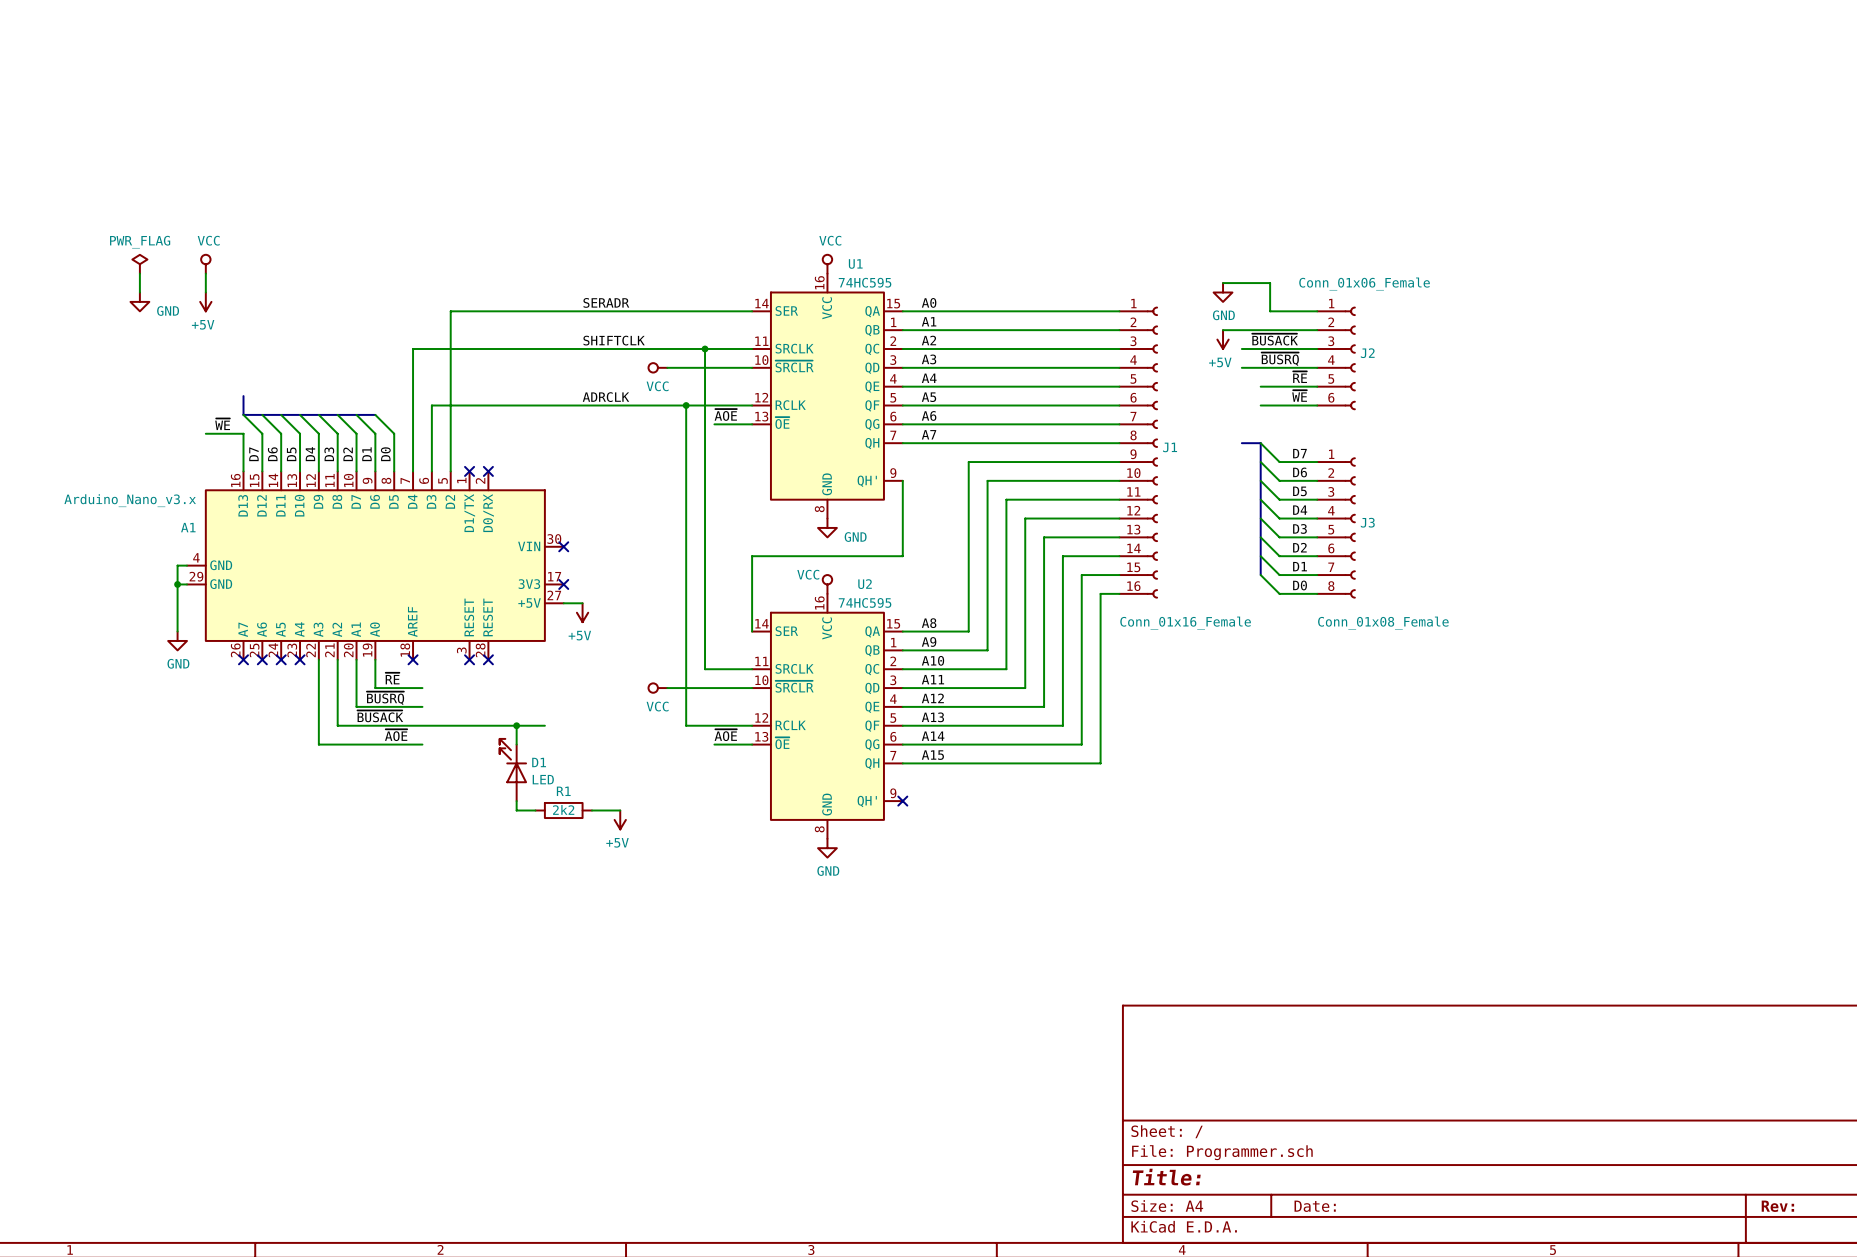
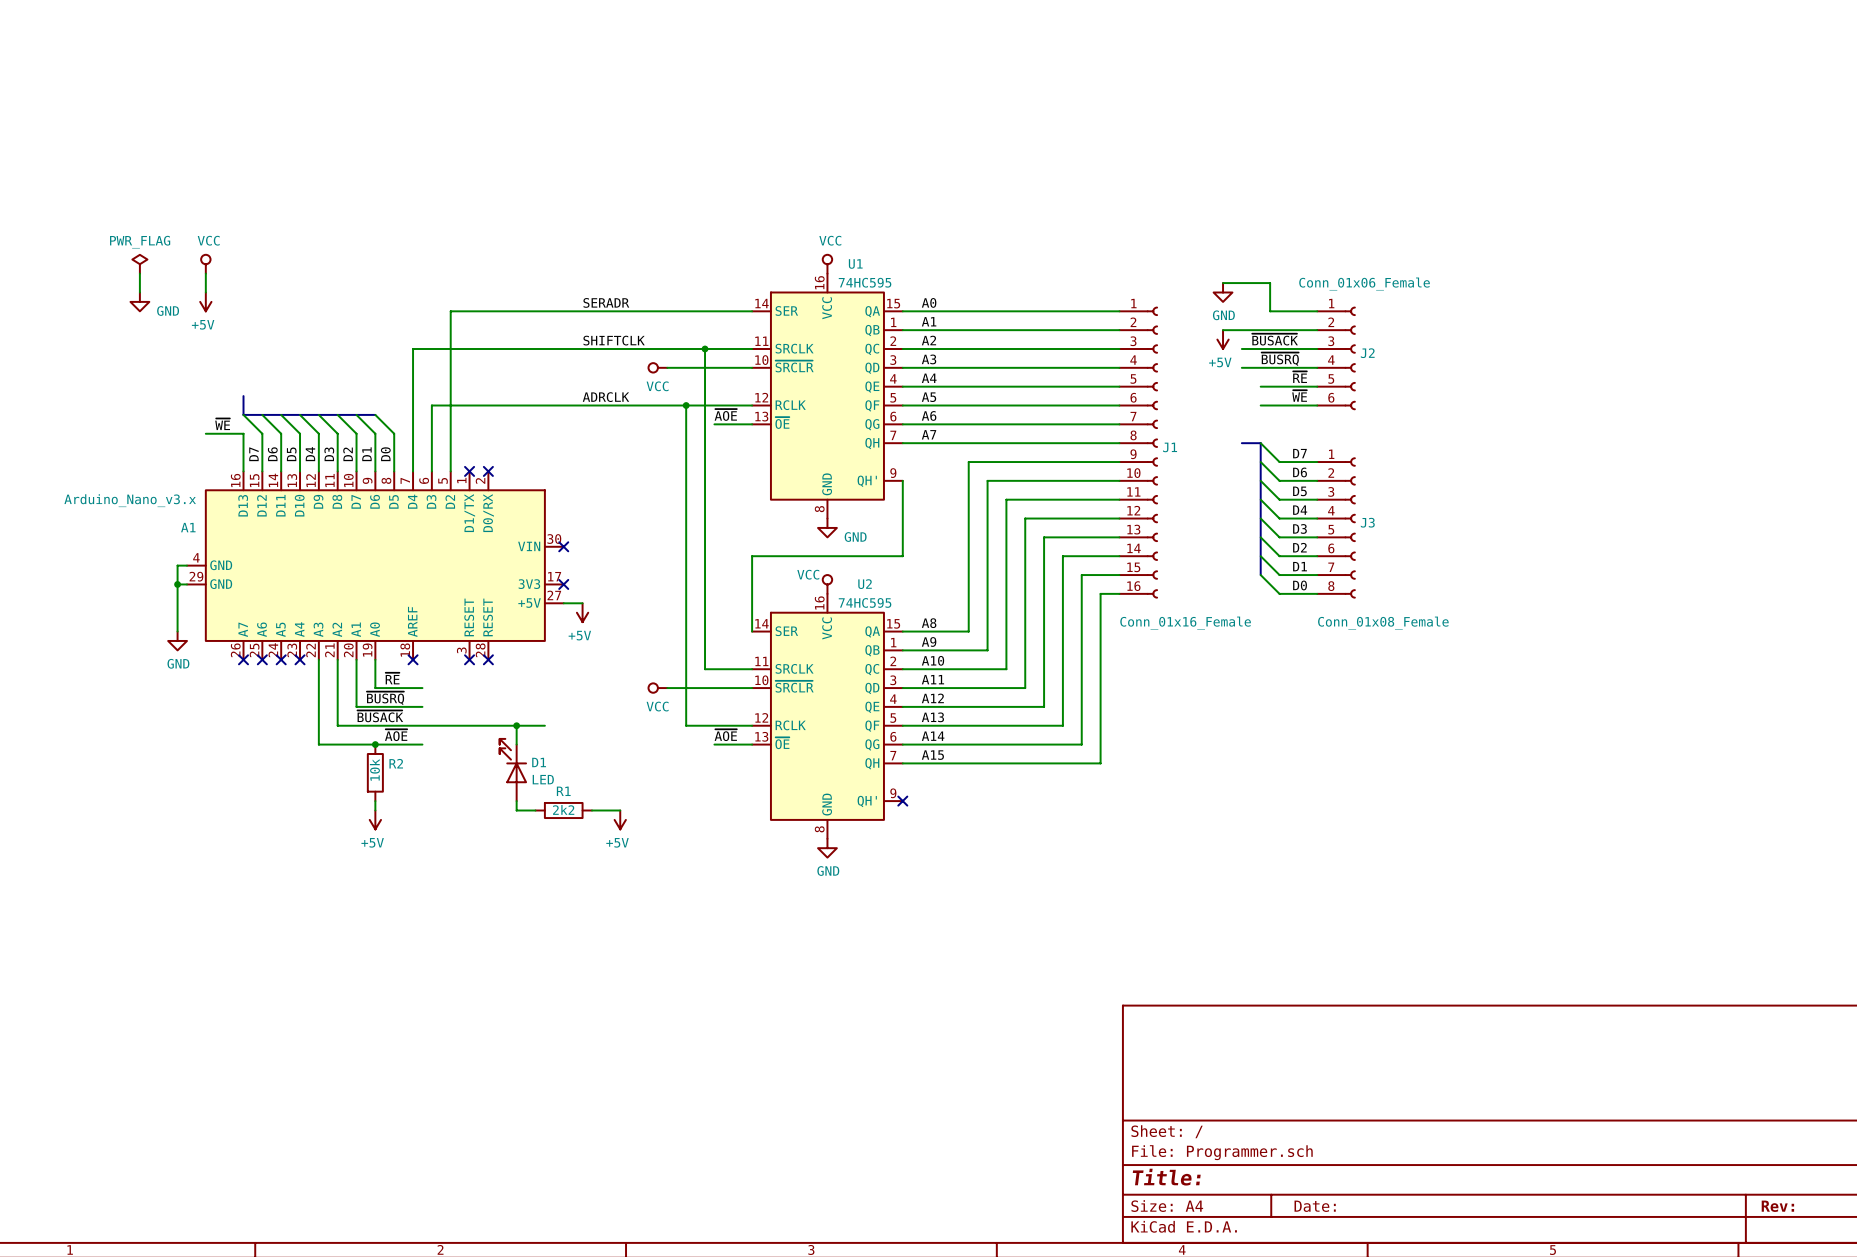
junction: none -> (375, 744)
R2: none -> 10k (375, 772)
wire: none -> (375, 801) (375, 810)
power symbol: none -> +5V (375, 819)

